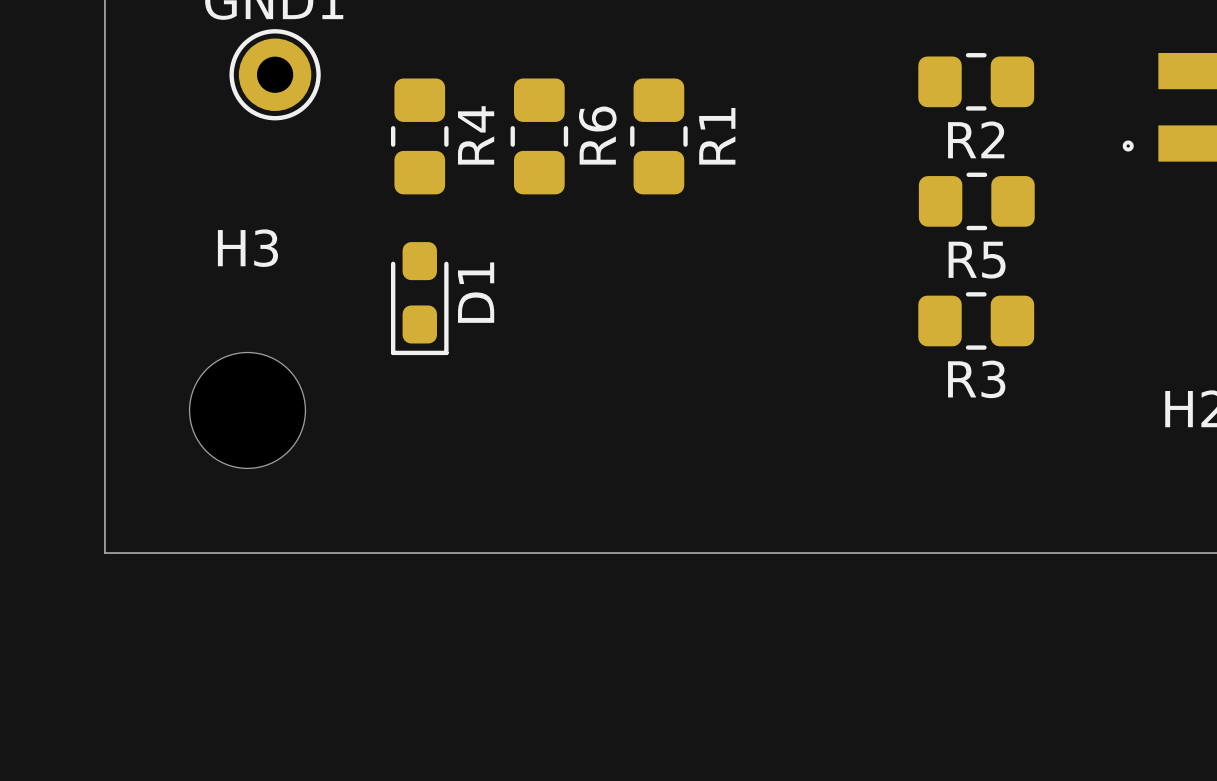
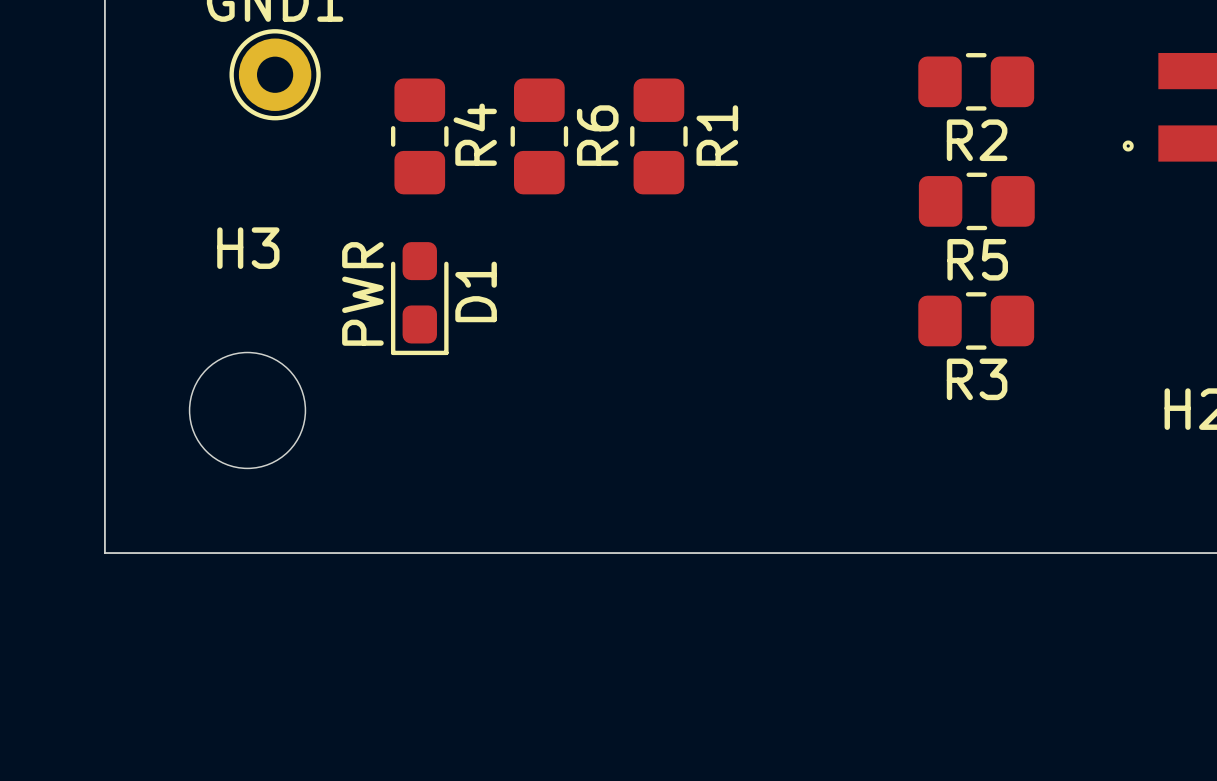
text: none -> PWR (362, 293)

